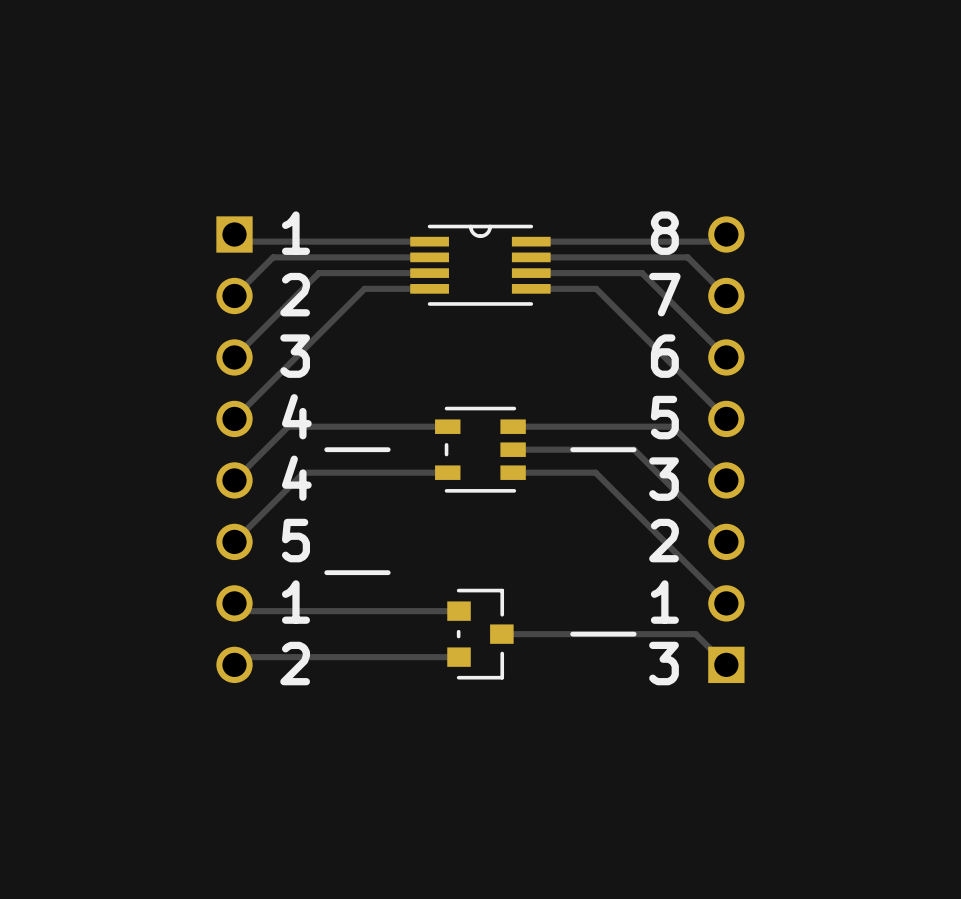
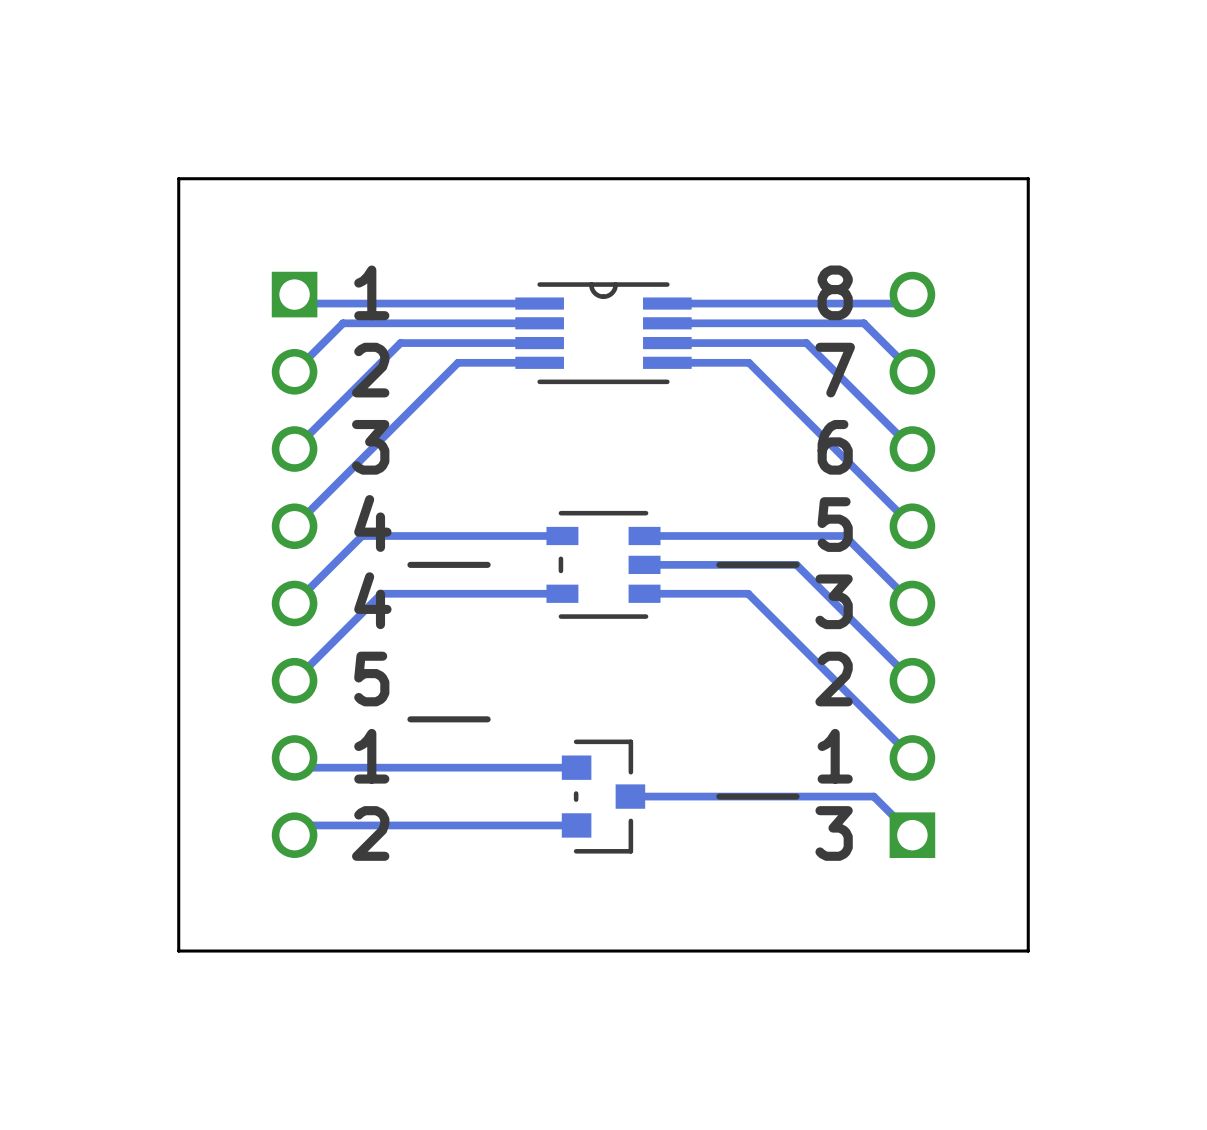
board edge: none -> (1028, 178) (1028, 951) (178, 951) (178, 178) (1028, 178)

